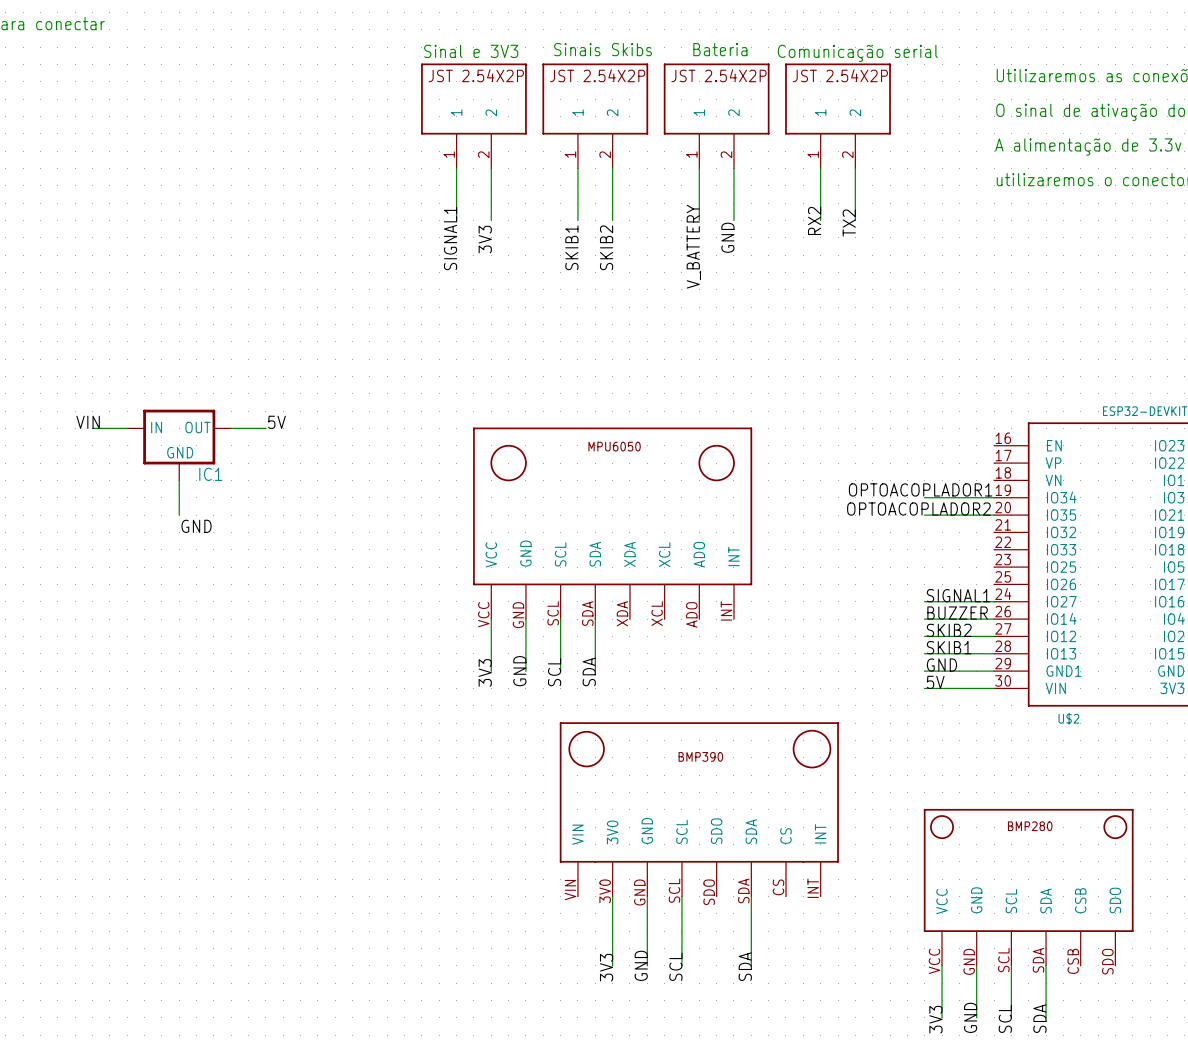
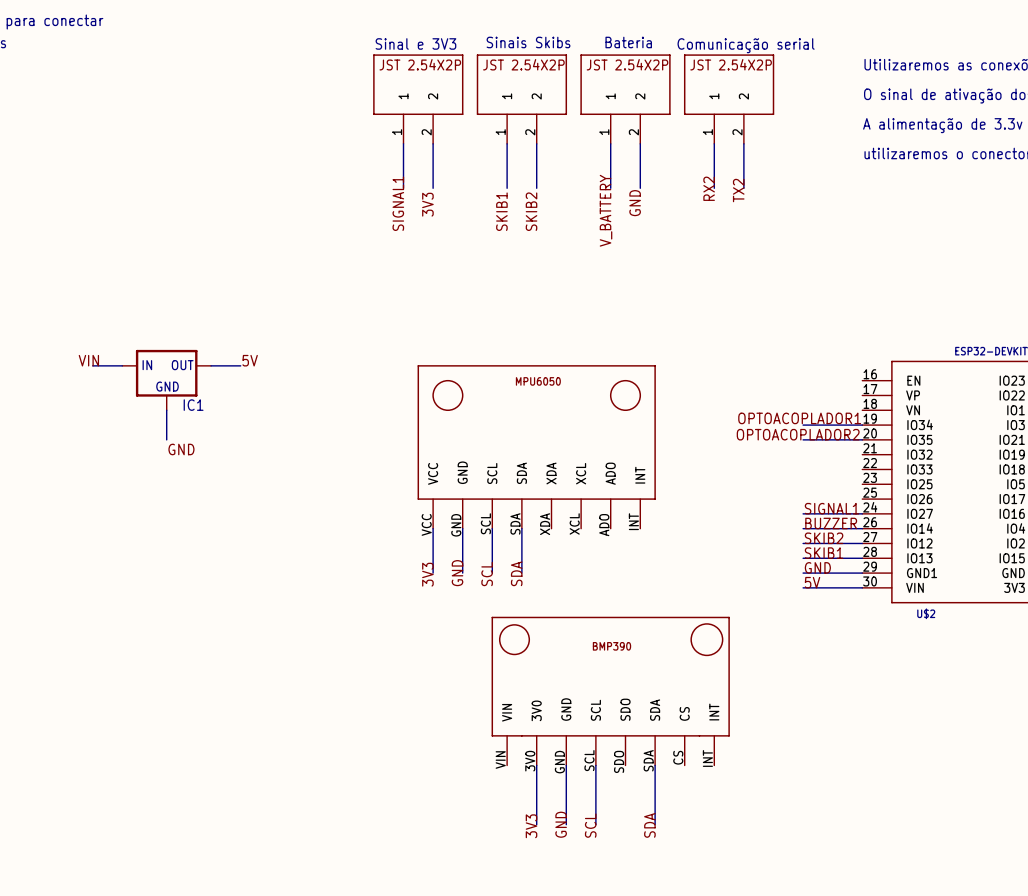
part: (1028, 887) -> none
wire: (942, 965) (942, 1017) -> none
wire: (976, 965) (976, 1017) -> none
wire: (1011, 965) (1011, 1017) -> none
wire: (1046, 965) (1046, 1017) -> none
label: GND (970, 1017) -> none
label: SCL (1005, 1018) -> none
label: SDA (1039, 1018) -> none
label: 3V3 (935, 1019) -> none

